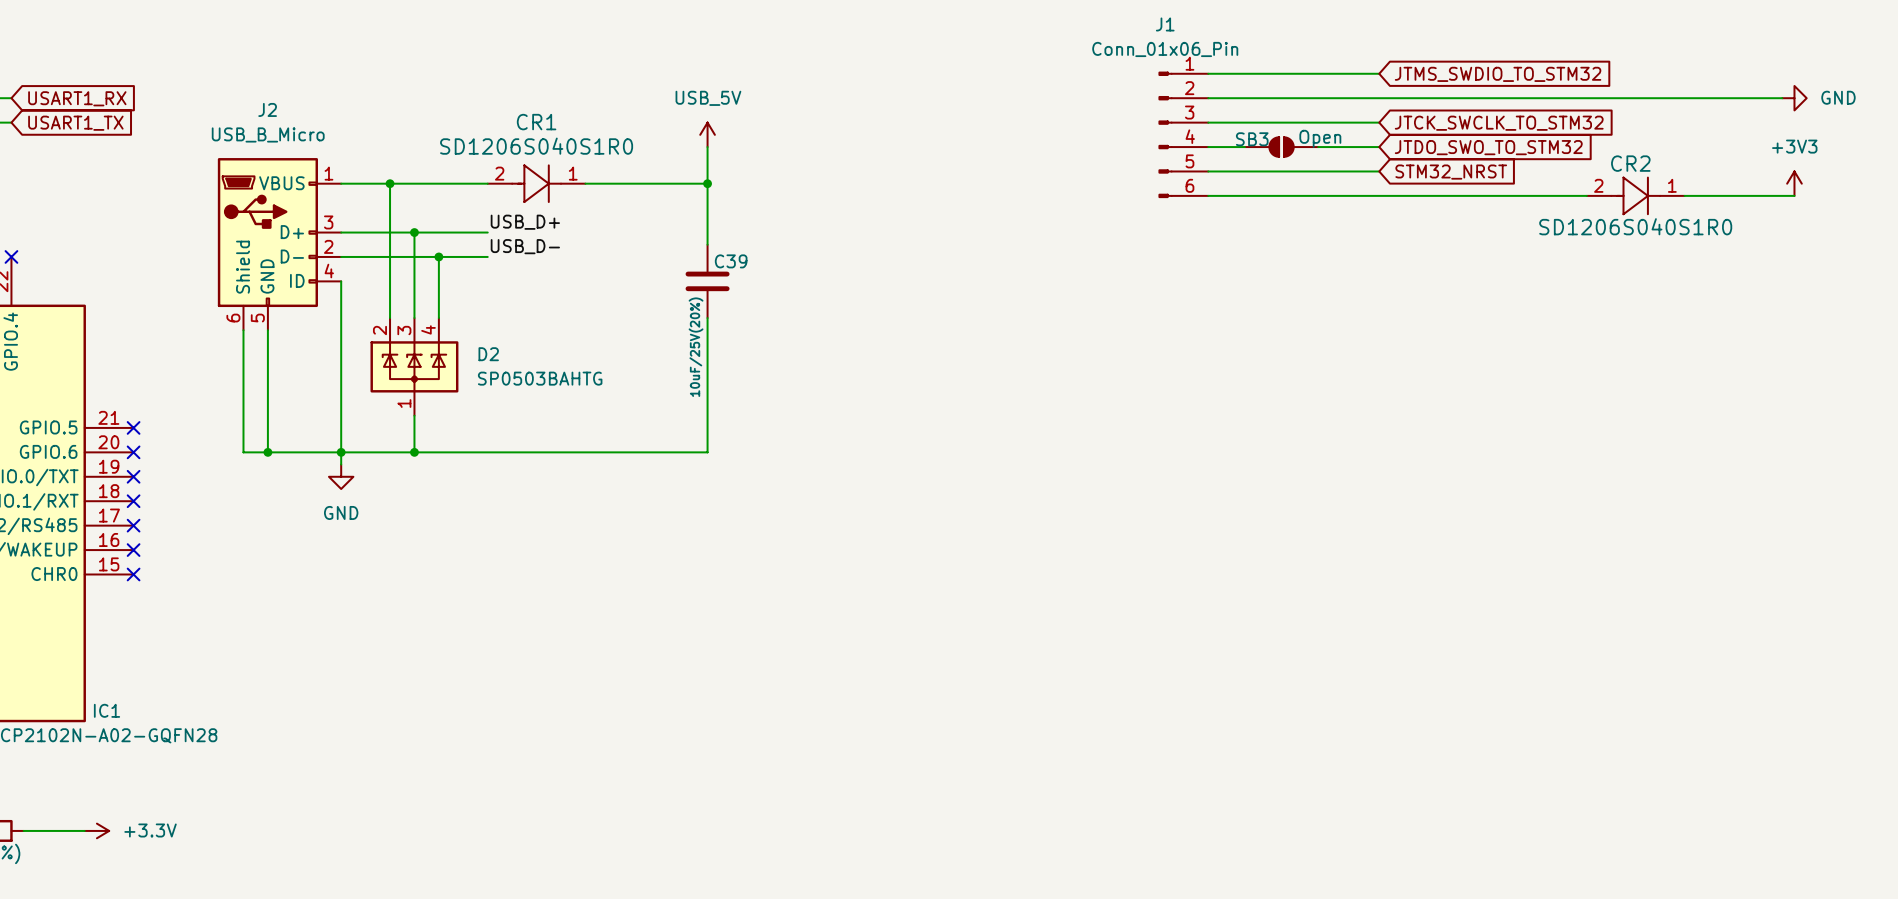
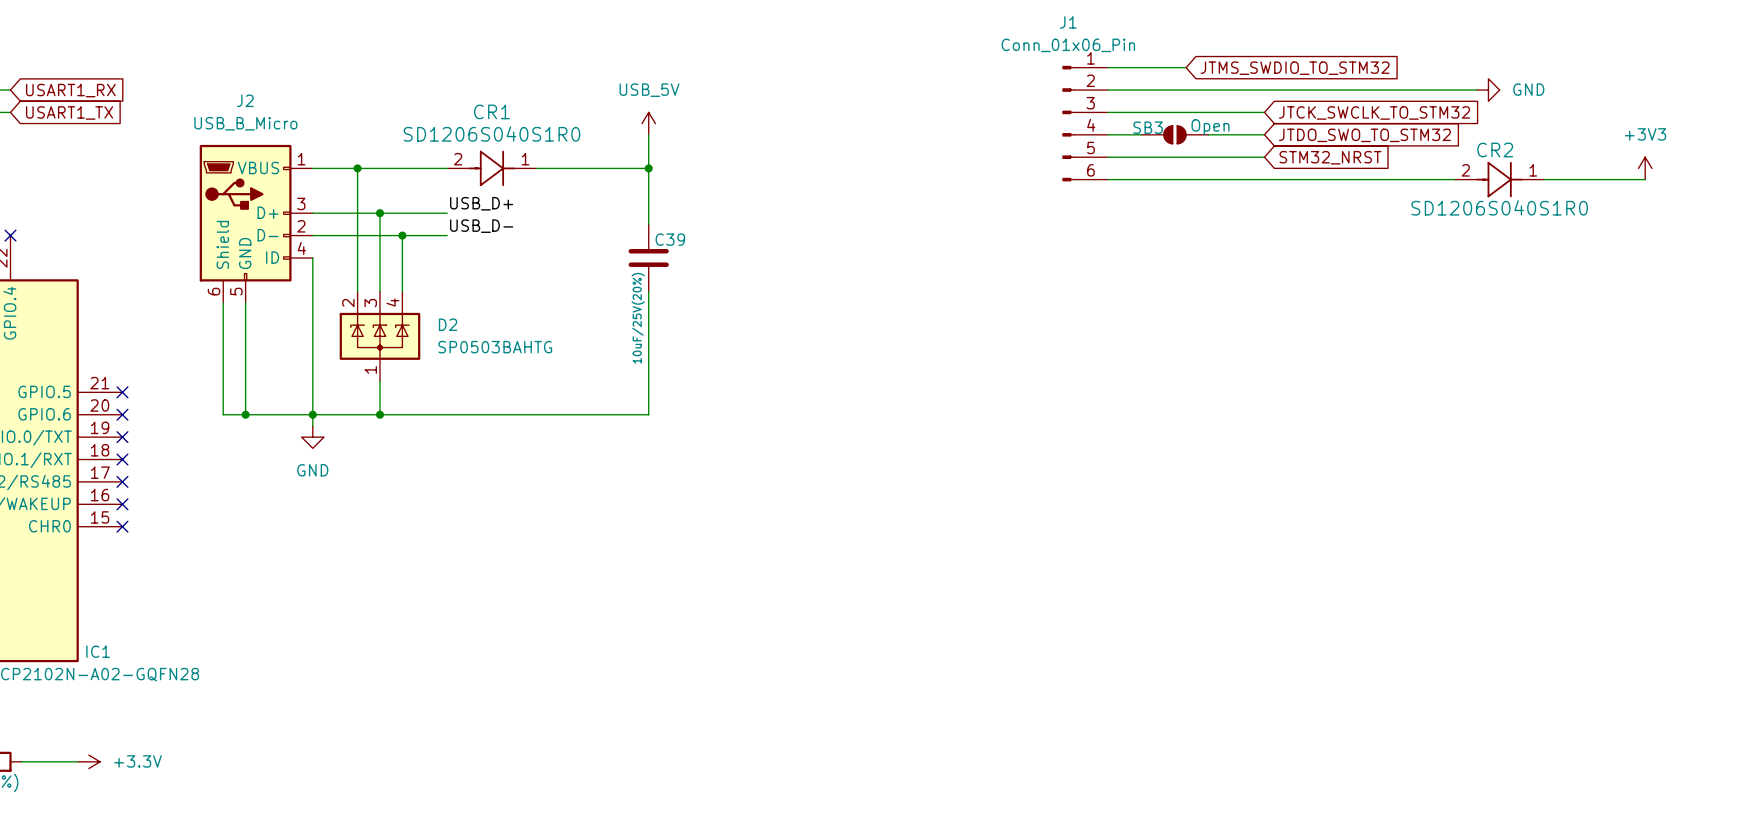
wire: (1293, 73) (1379, 73) -> none
global label position: JTMS_SWDIO_TO_STM32 (1498, 74) -> JTMS_SWDIO_TO_STM32 (1295, 68)
wire: (1611, 98) (1782, 98) -> none
power symbol position: GND (1794, 98) -> GND (1488, 90)

